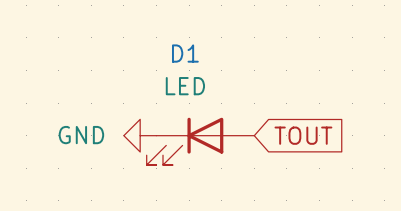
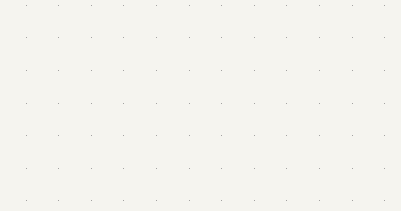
power symbol: GND (140, 135) -> none
global label: TOUT (303, 135) -> none
D1: LED (200, 141) -> none

